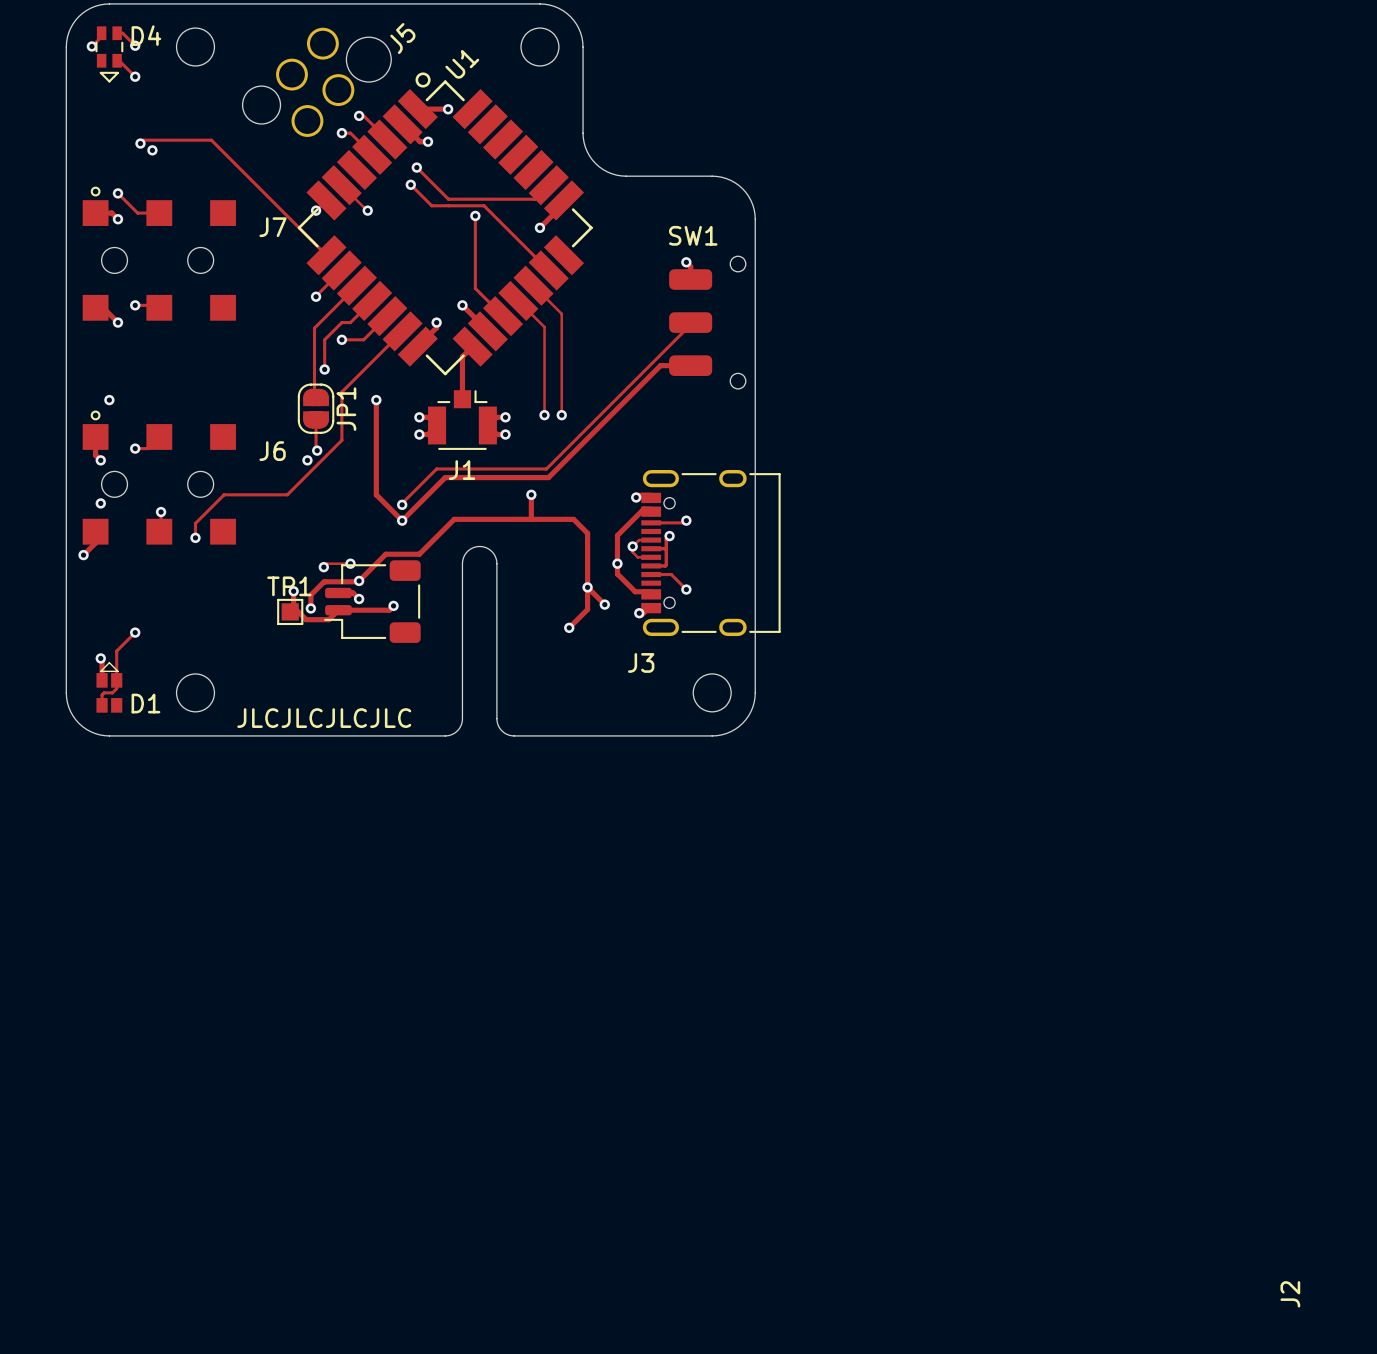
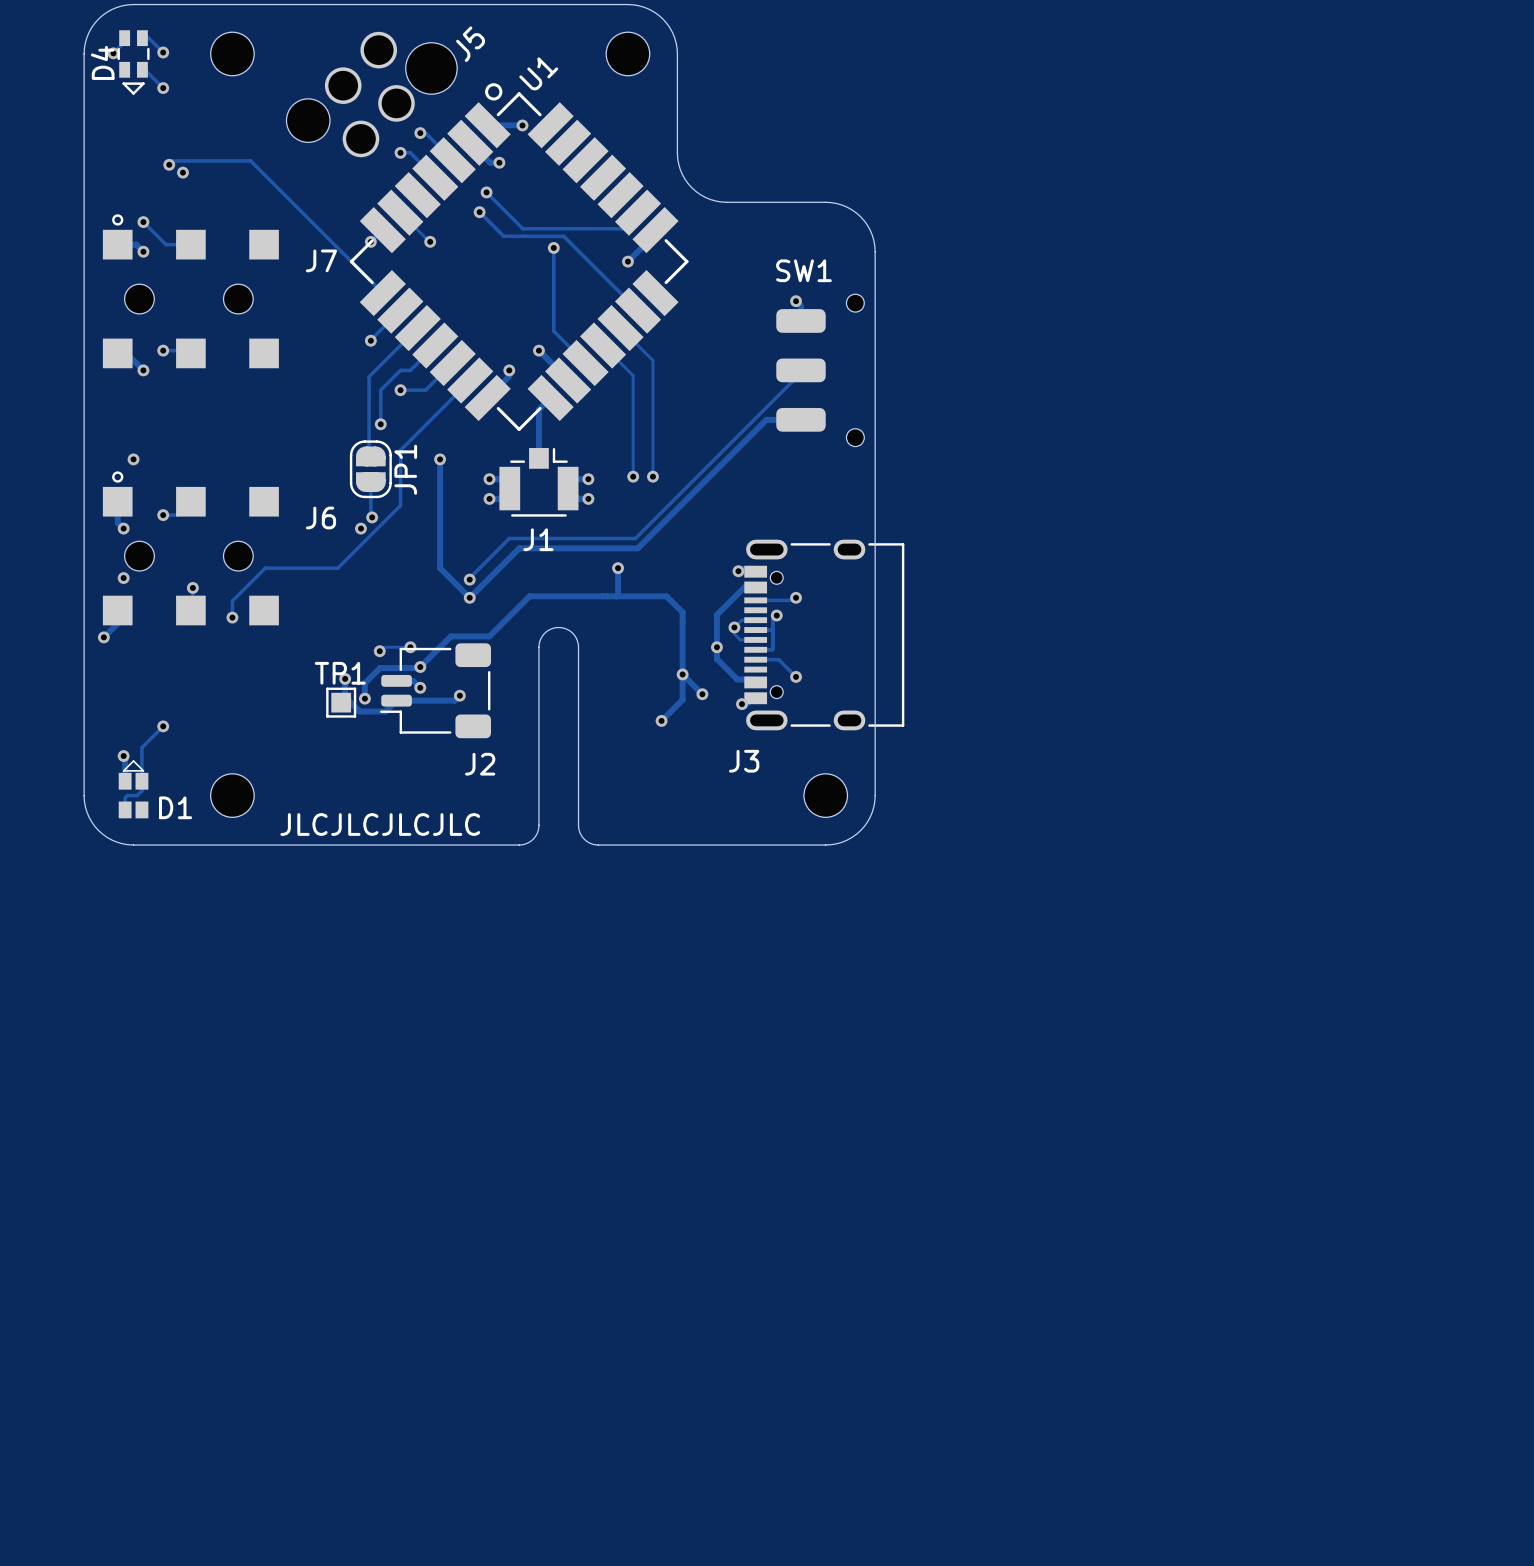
D4 name rotation: 0° (146, 35) -> 90° counterclockwise (102, 62)
D4 name position: D4 (146, 35) -> D4 (102, 62)
J2 name rotation: 0° (1290, 1294) -> 90° clockwise (480, 764)
J2 name position: J2 (1290, 1294) -> J2 (480, 764)

